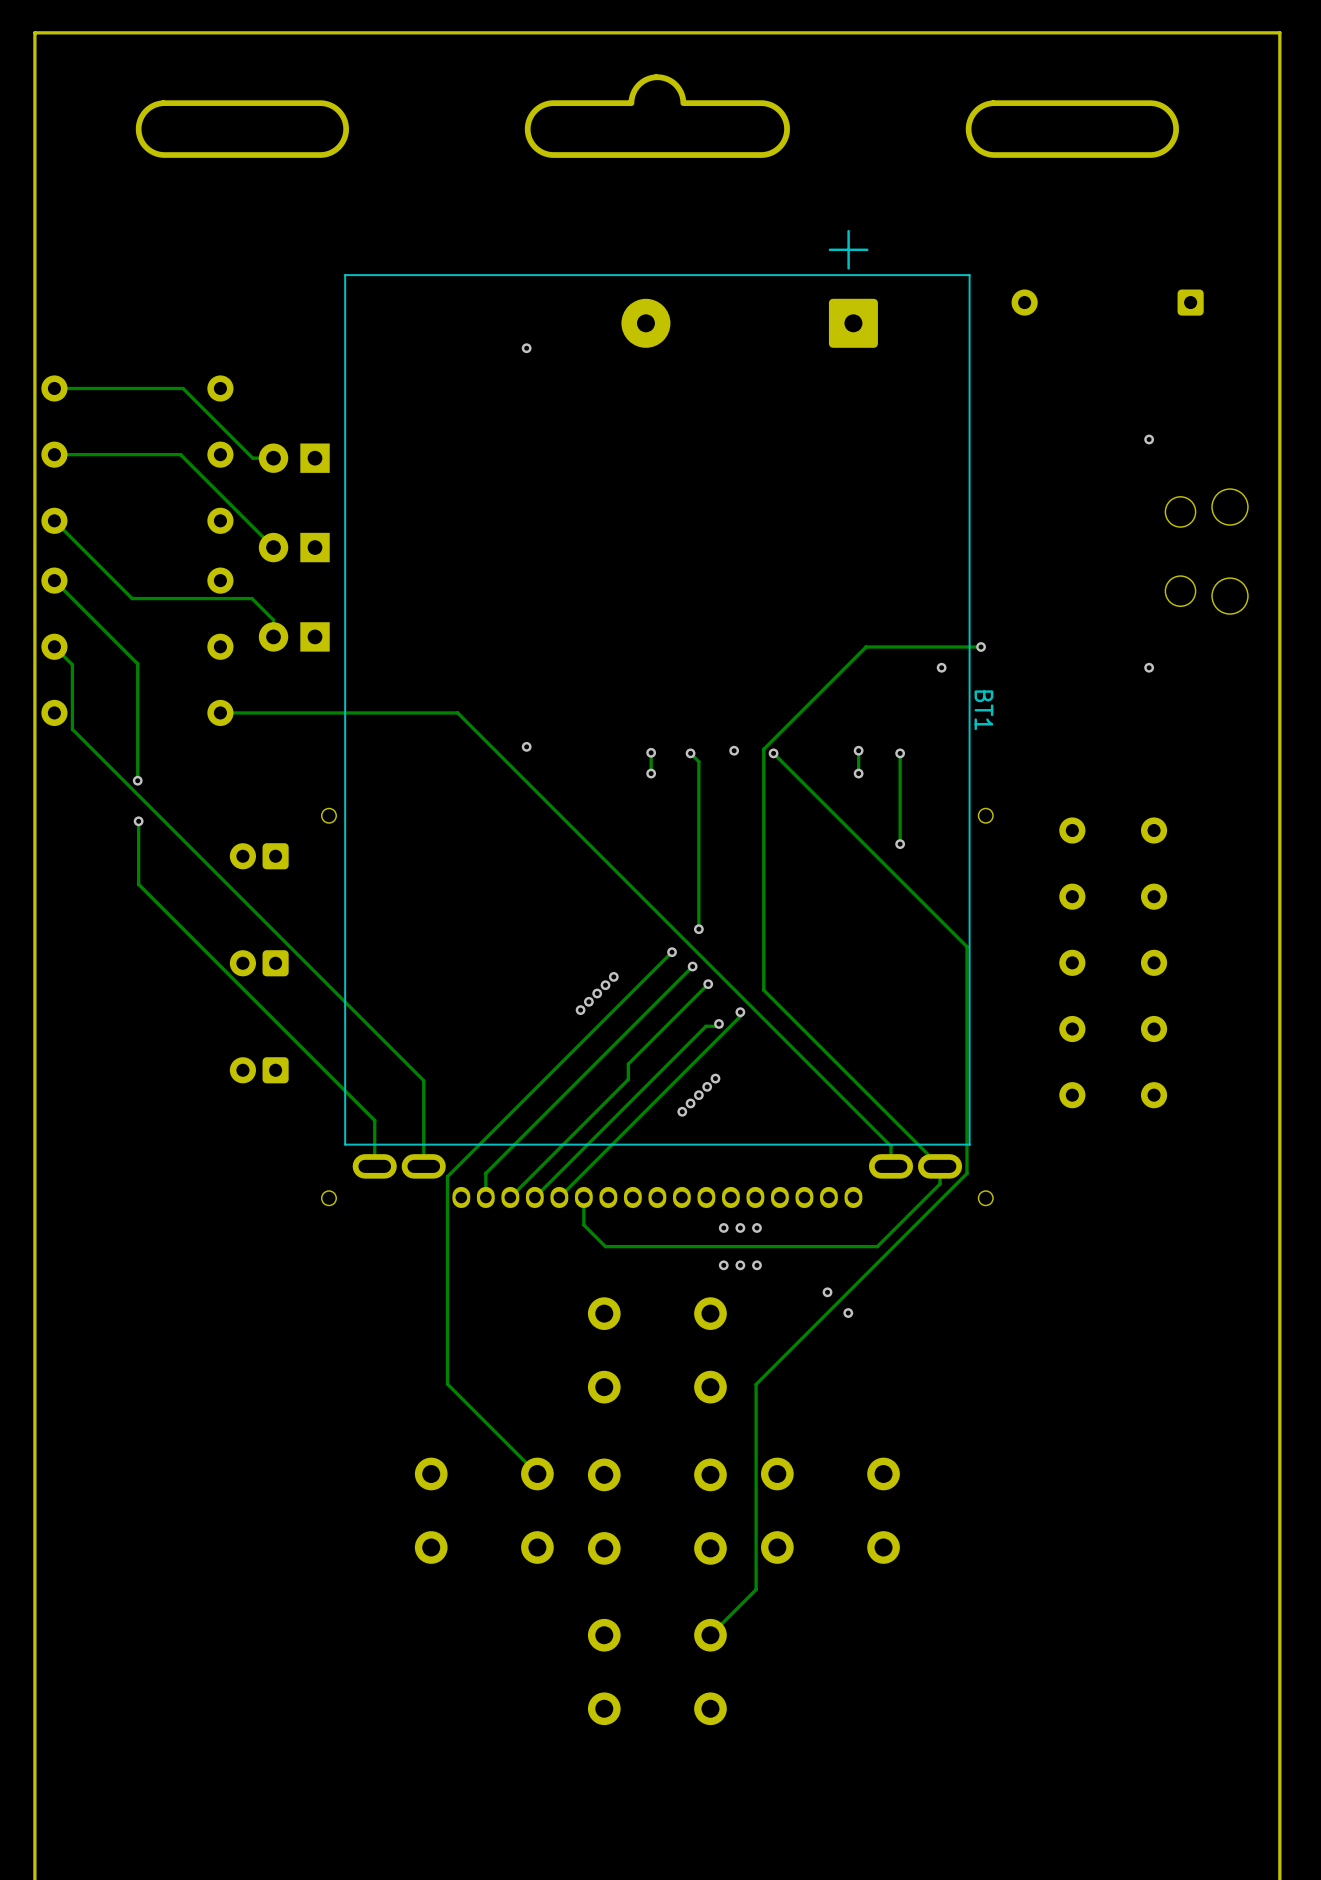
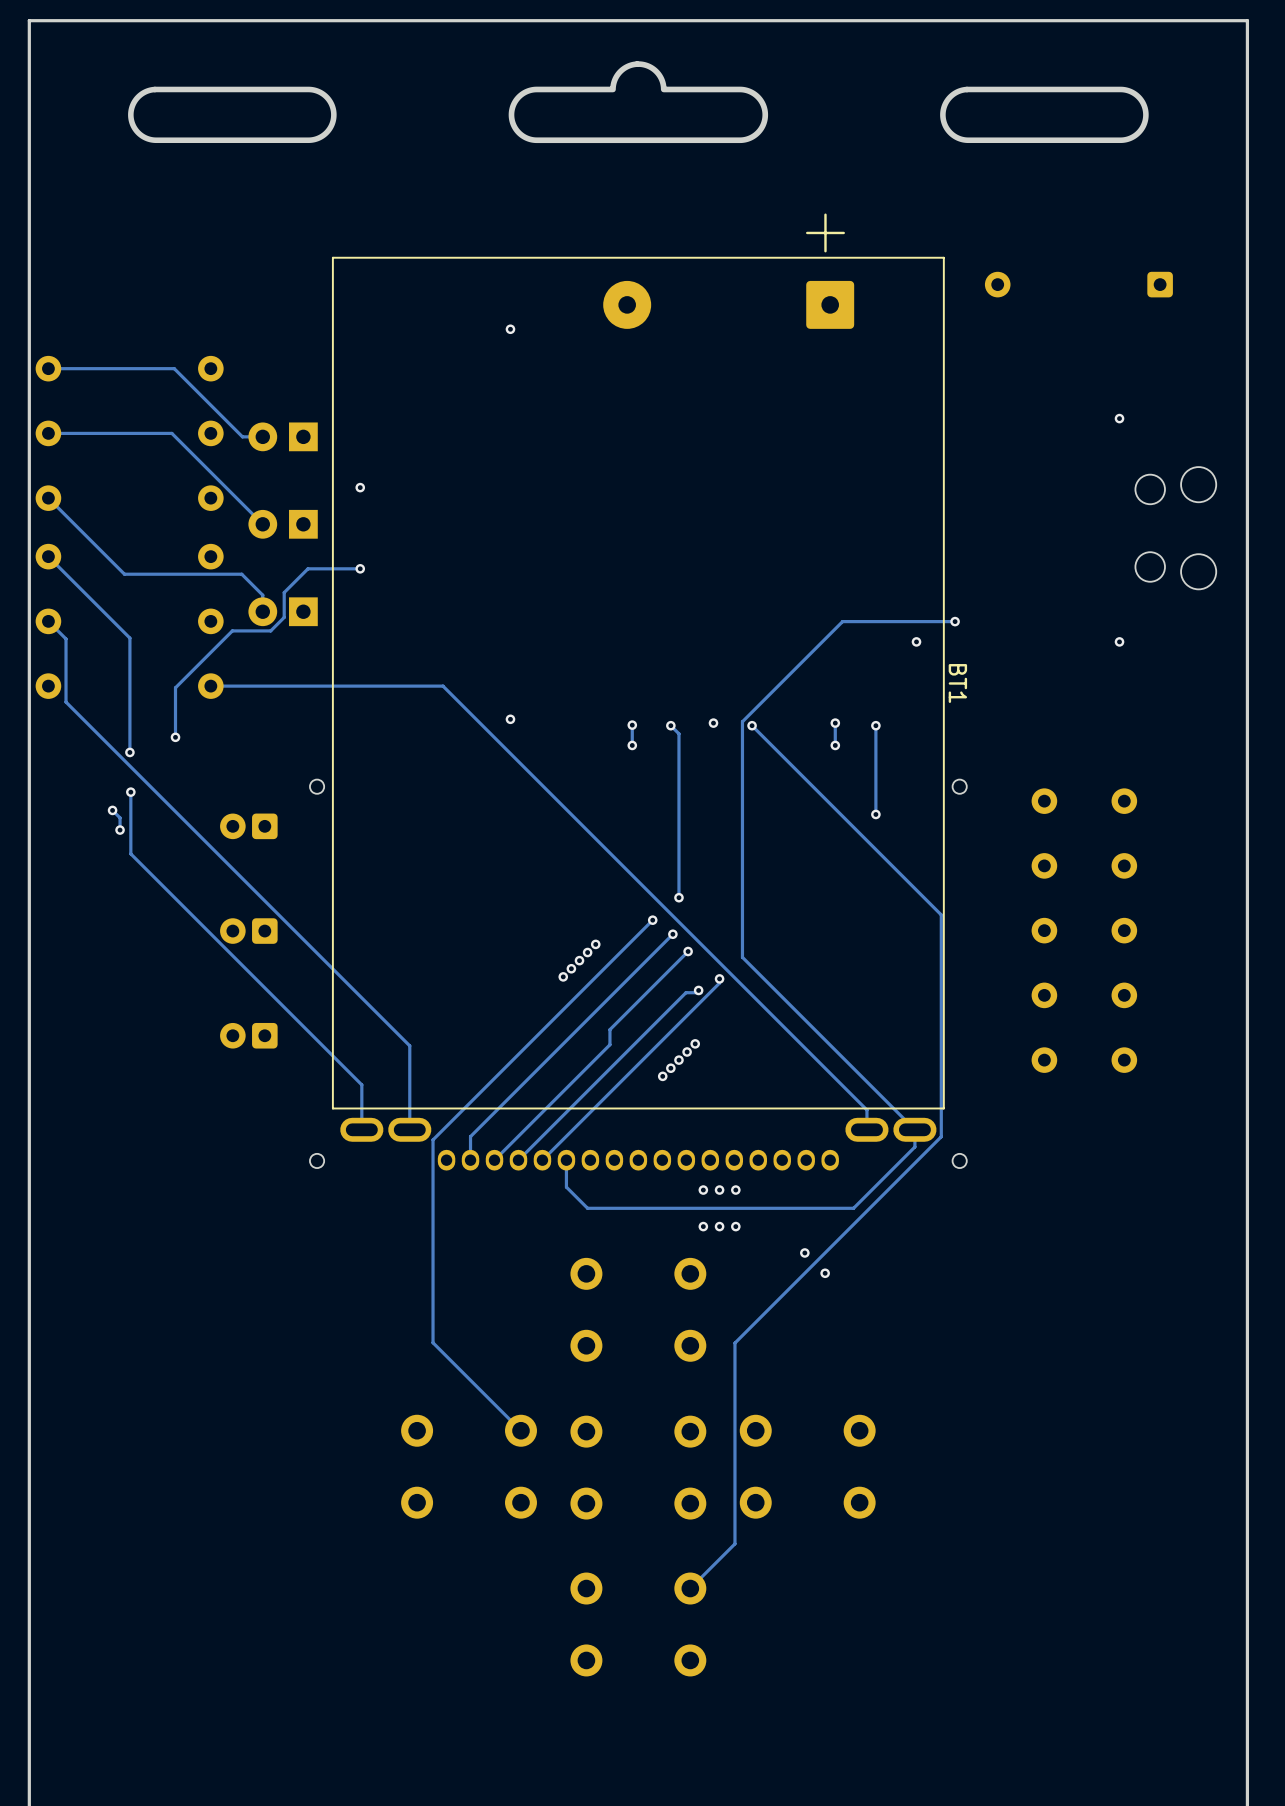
via: none -> (360, 487)
track: none -> (360, 568) (307, 568) (284, 592) (284, 617) (270, 630) (232, 630) (175, 687) (175, 737)
via: none -> (360, 568)
via: none -> (175, 737)
track: none -> (112, 810) (120, 817) (120, 830)
via: none -> (112, 810)
via: none -> (120, 830)

